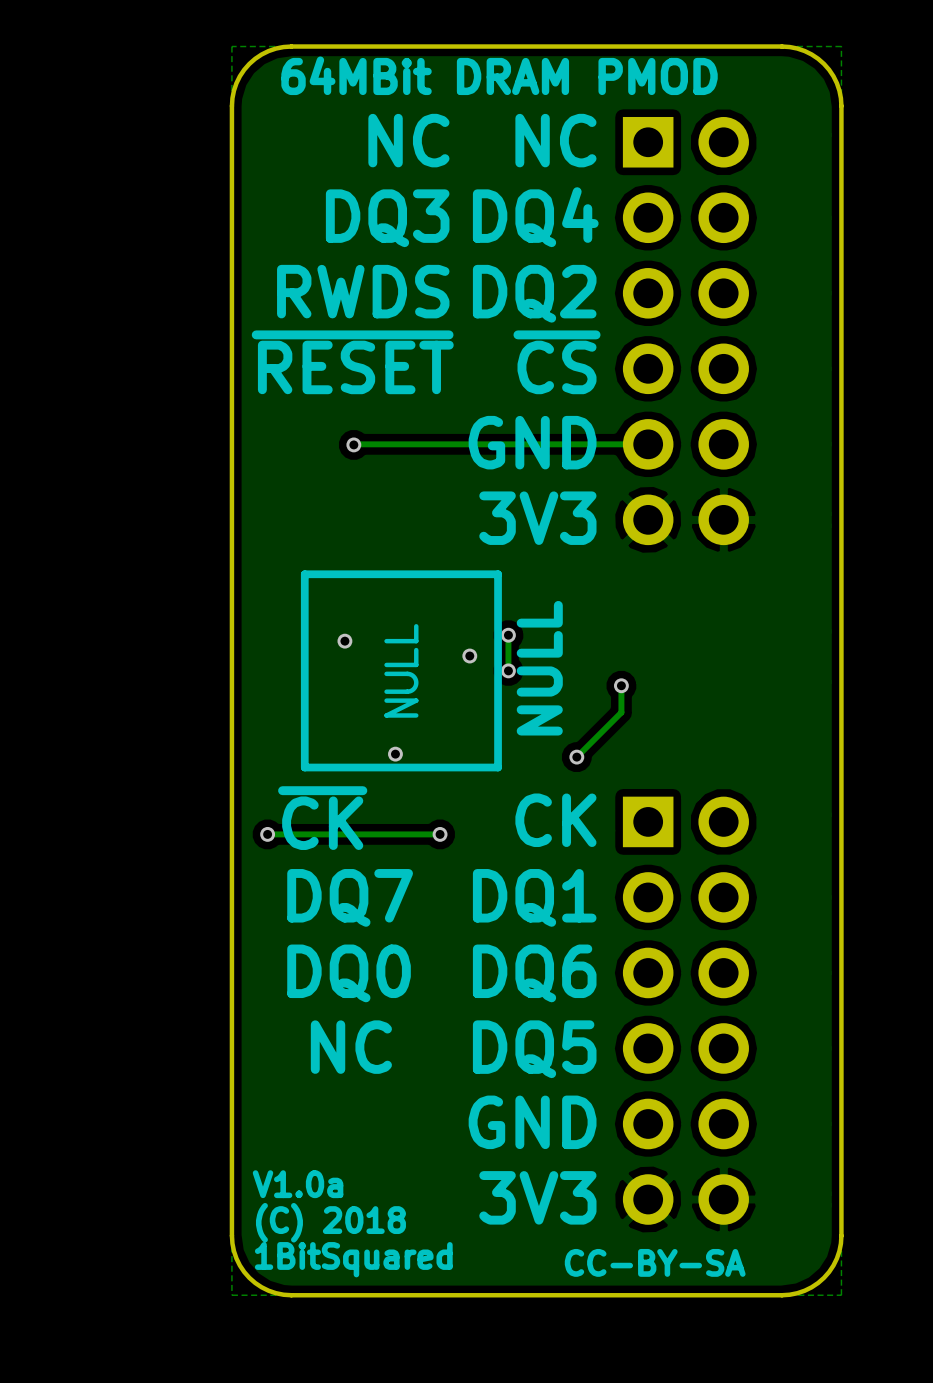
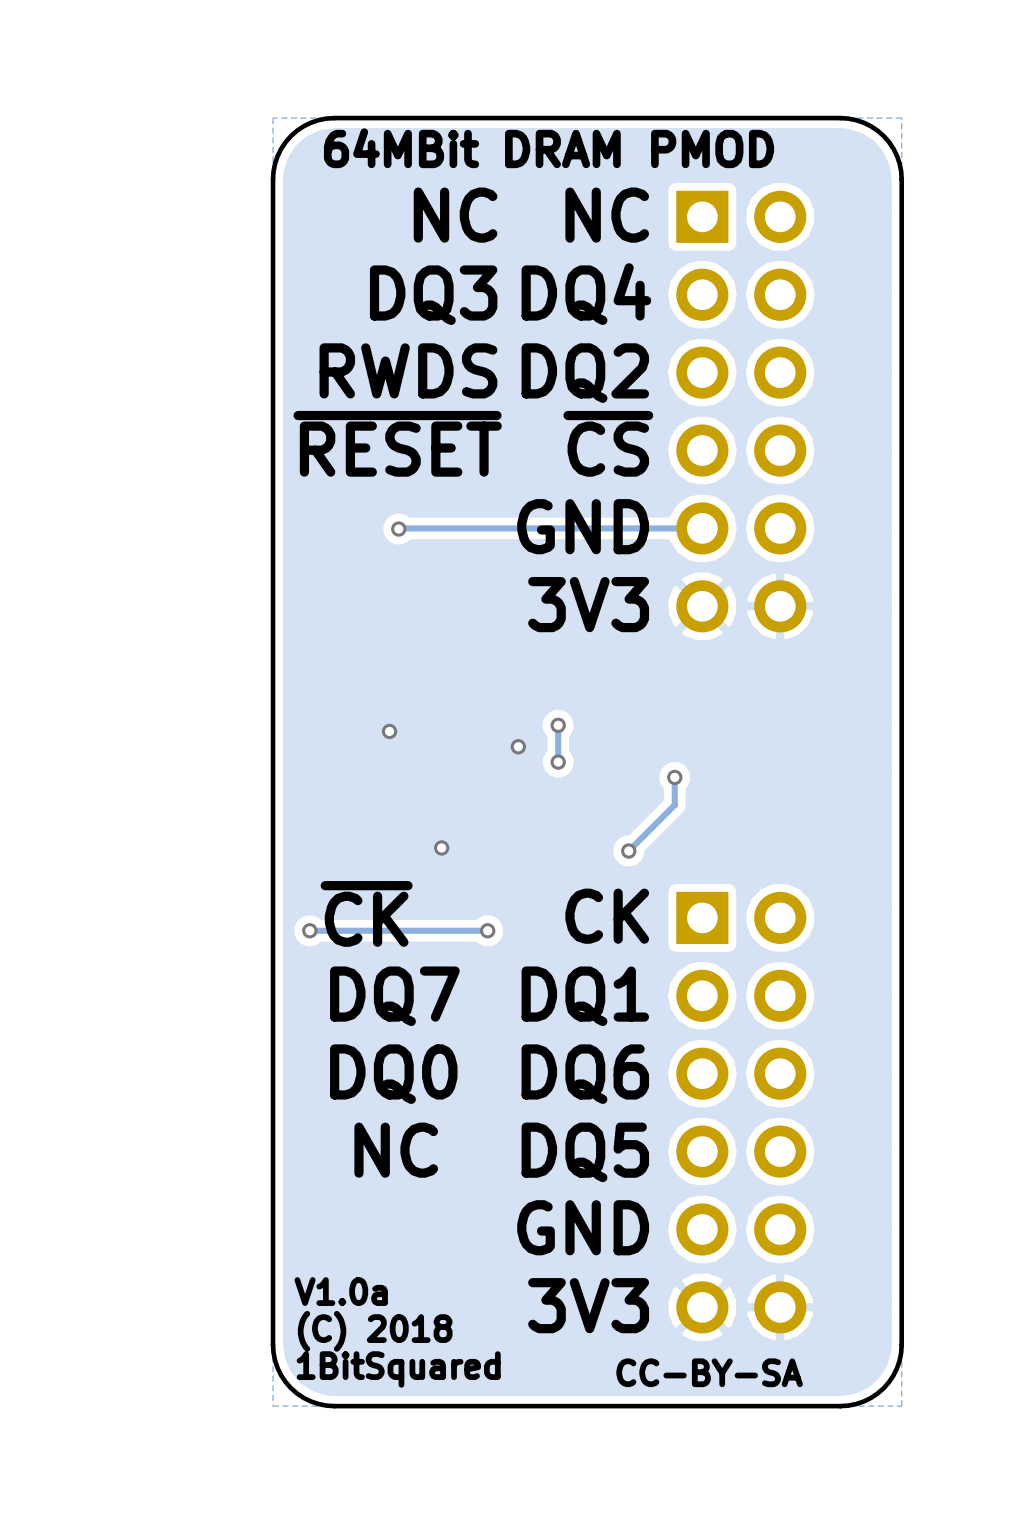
drawing: [300, 570, 502, 772] -> none
text: NULL (539, 668) -> none

